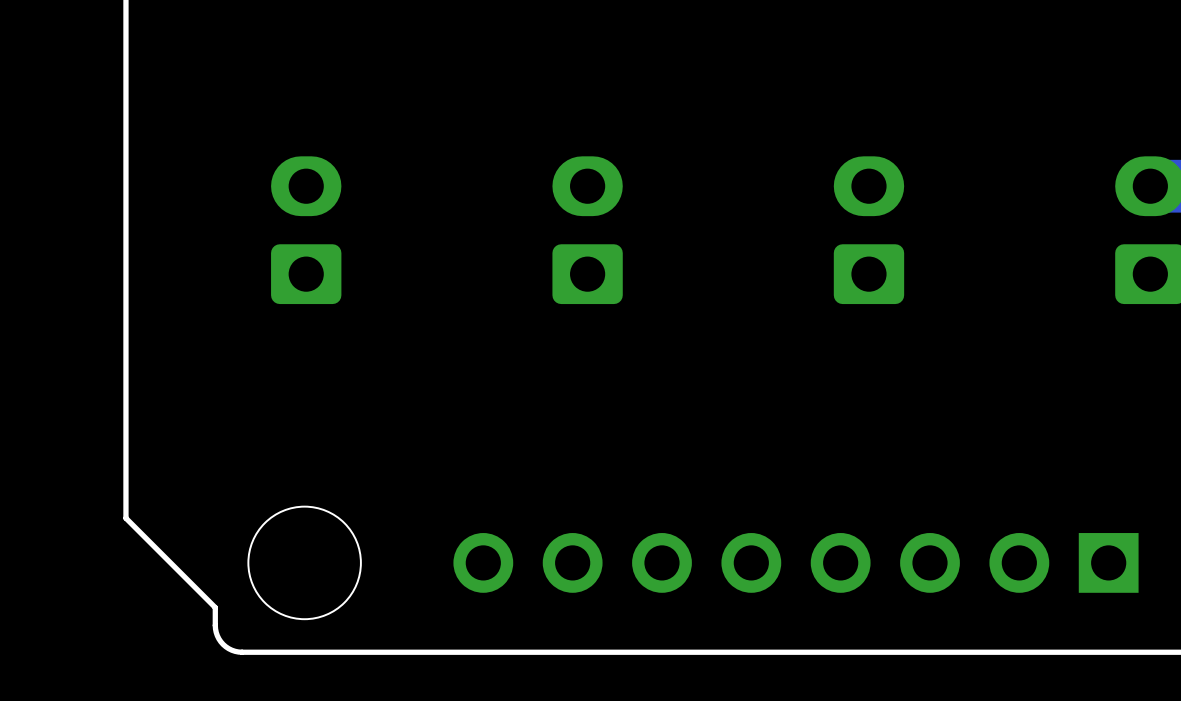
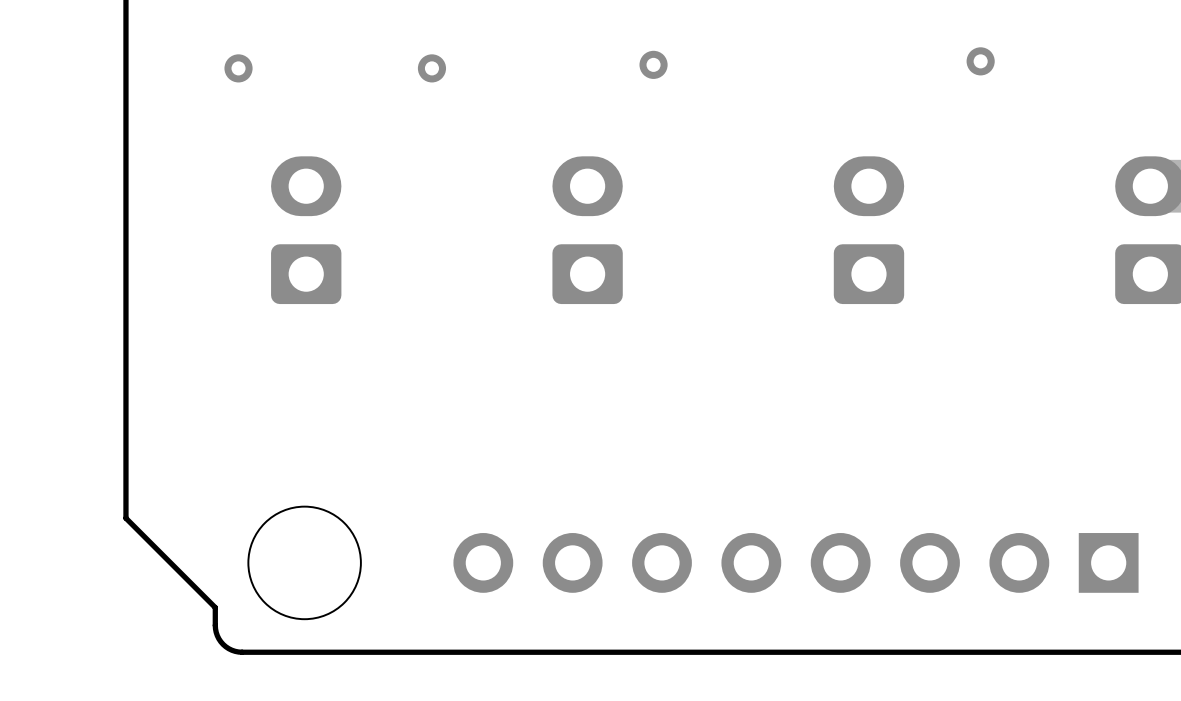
via: none -> (980, 61)
via: none -> (653, 64)
via: none -> (238, 68)
via: none -> (431, 68)

